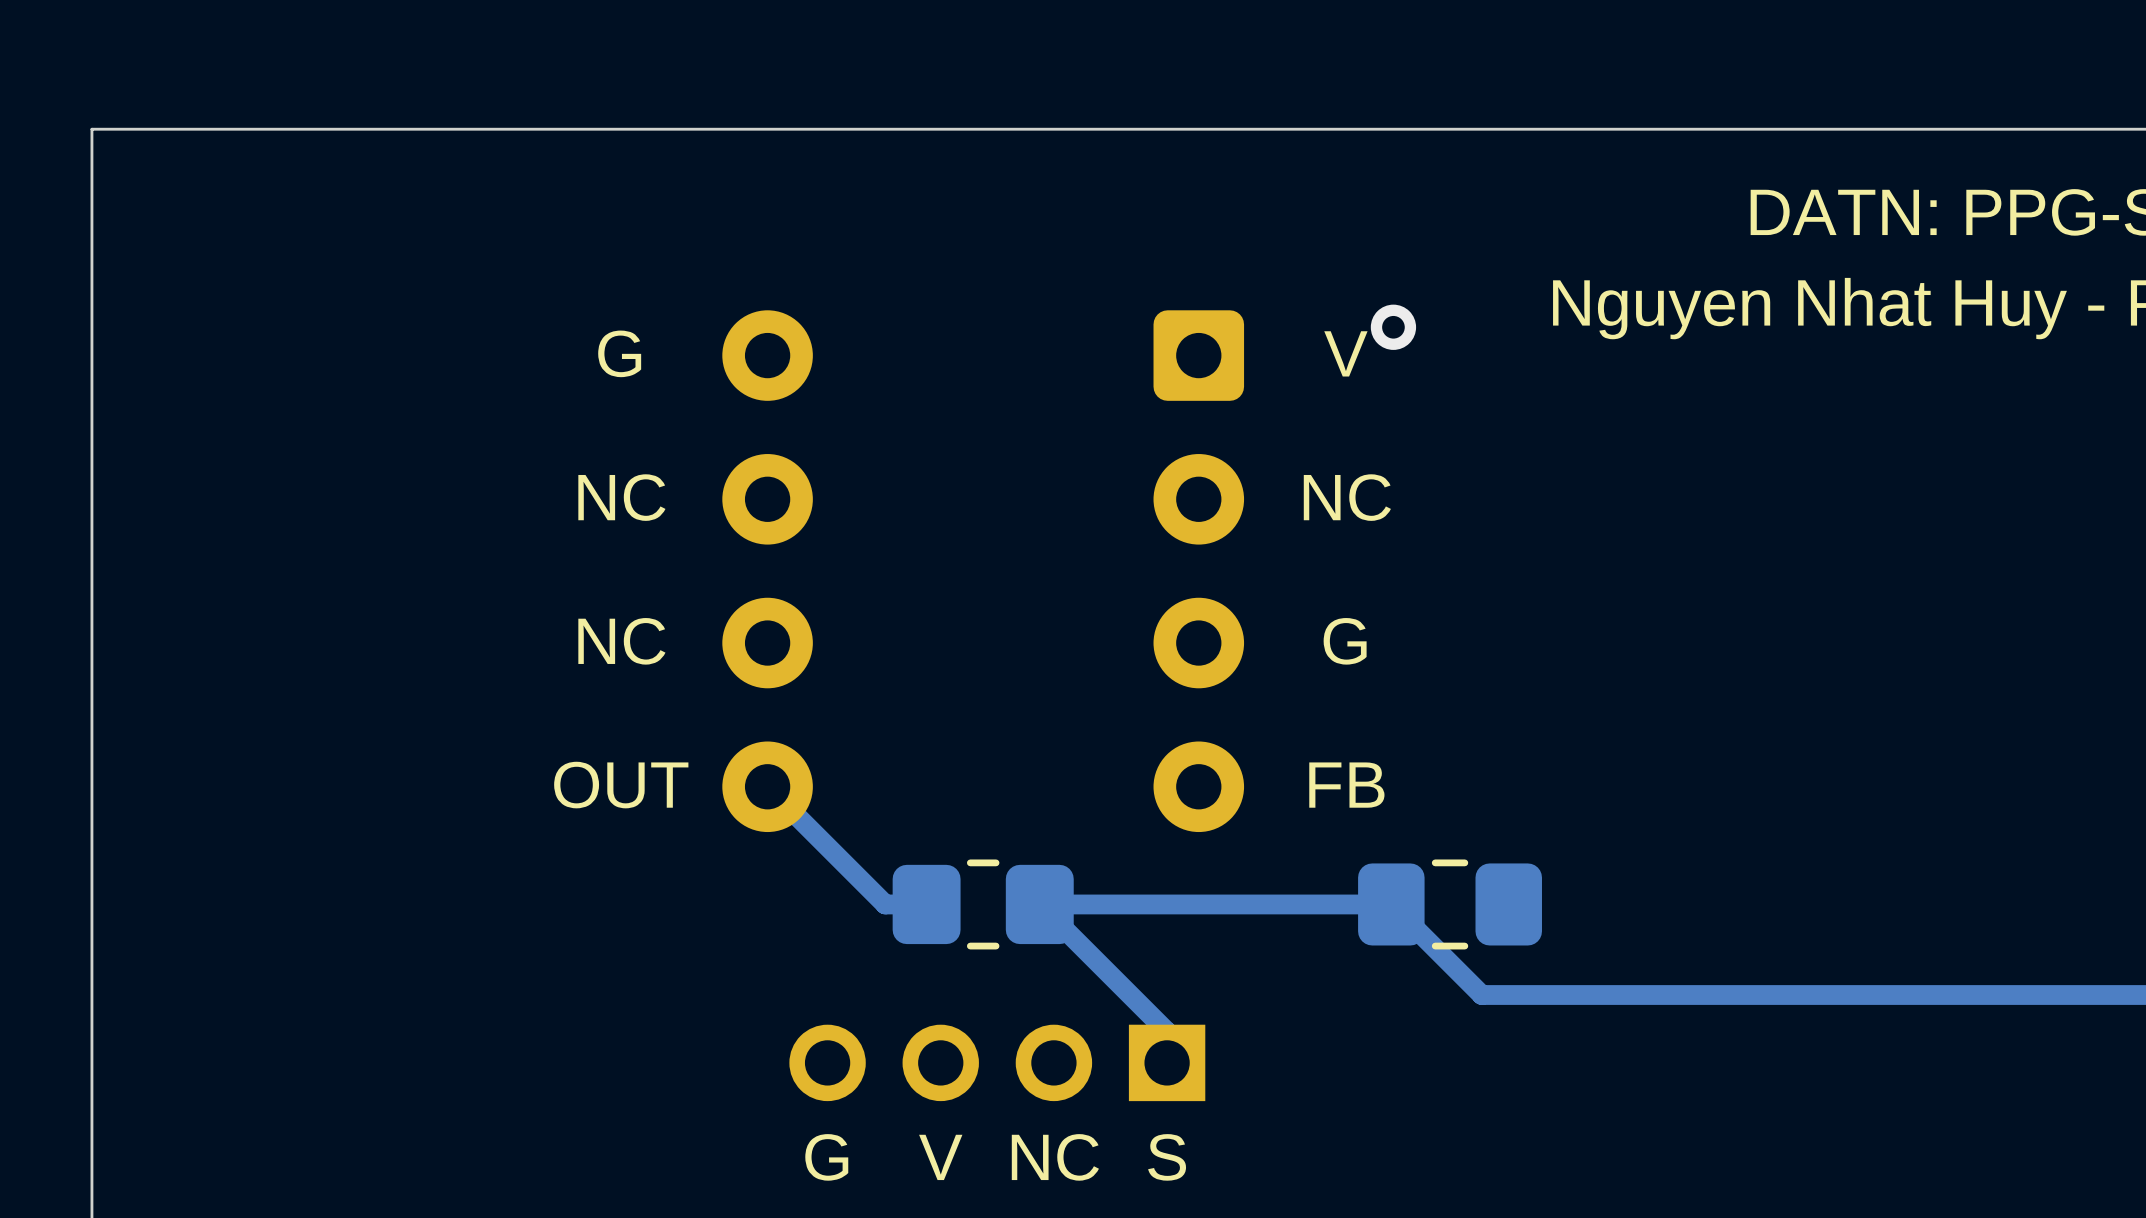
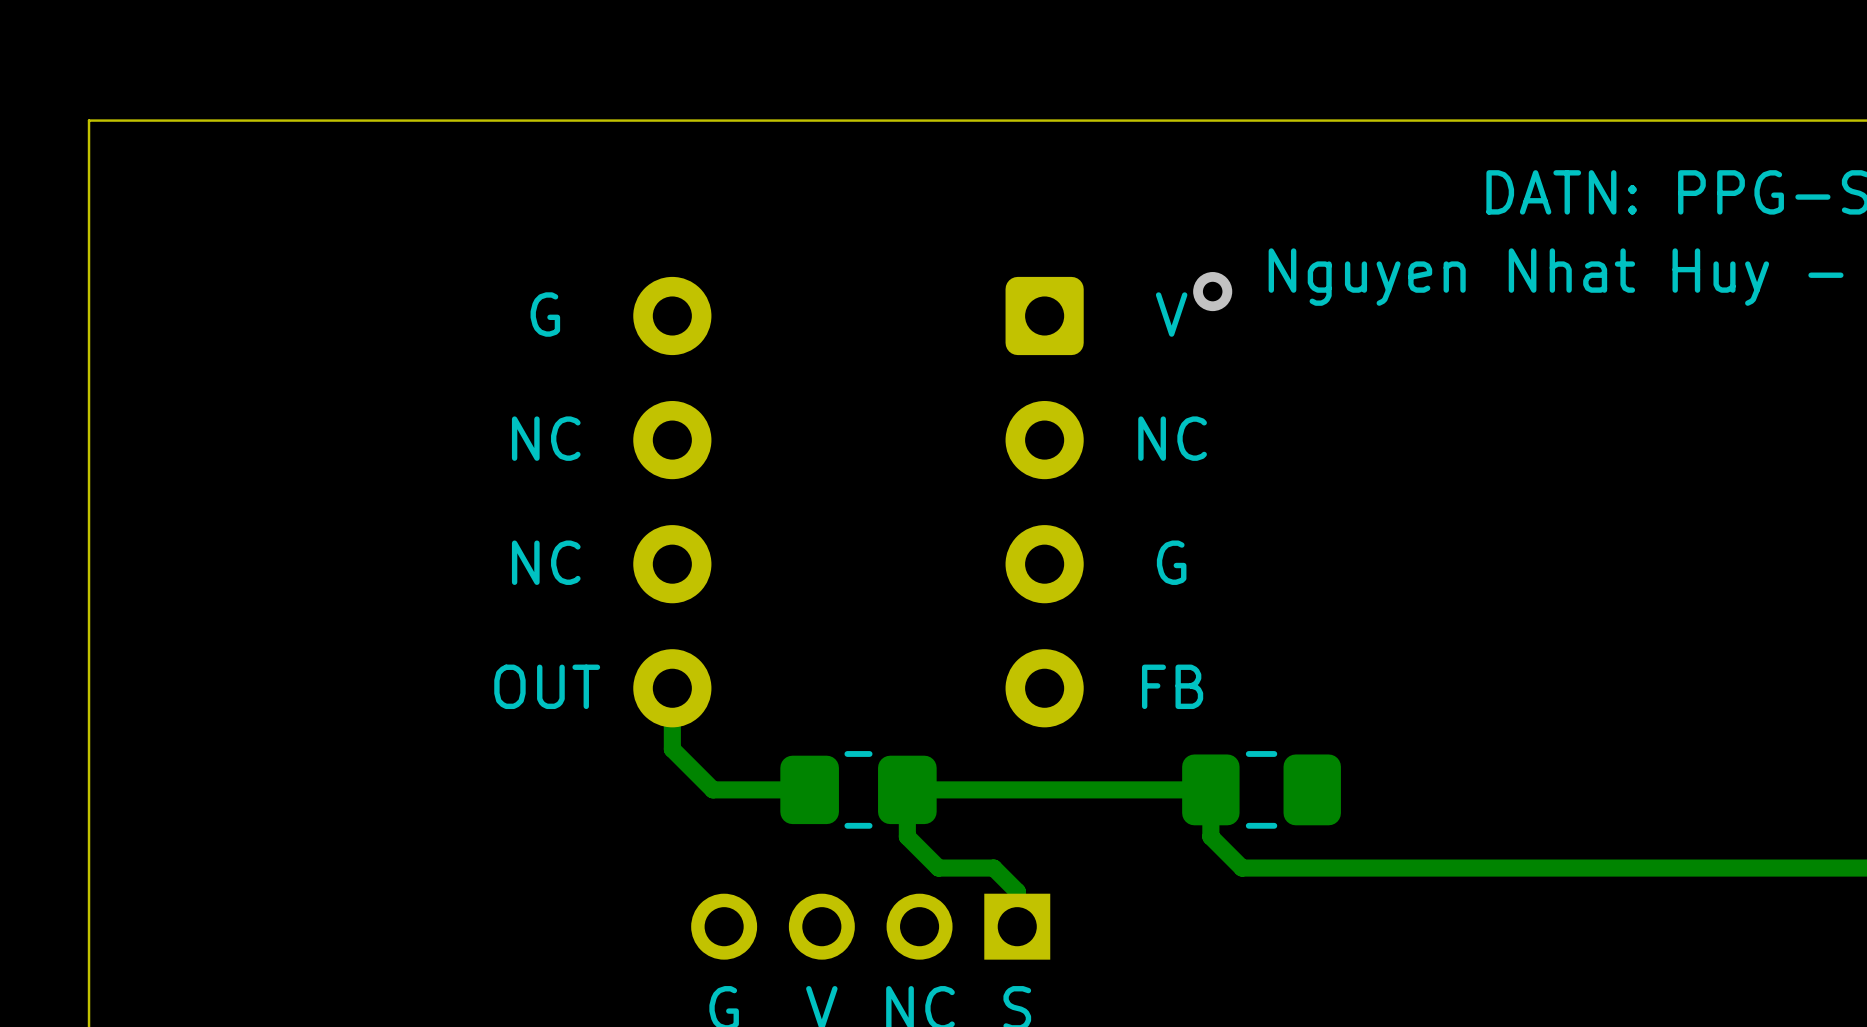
track: (767, 786) (885, 904) -> (672, 688) (672, 749) (712, 789) (773, 789)
track: (1039, 904) (1167, 1031) -> (907, 789) (907, 836) (938, 868) (993, 868) (1017, 891) (1017, 899)
track: (1391, 904) (1481, 995) -> (1210, 789) (1210, 836) (1242, 868) (1289, 868)

